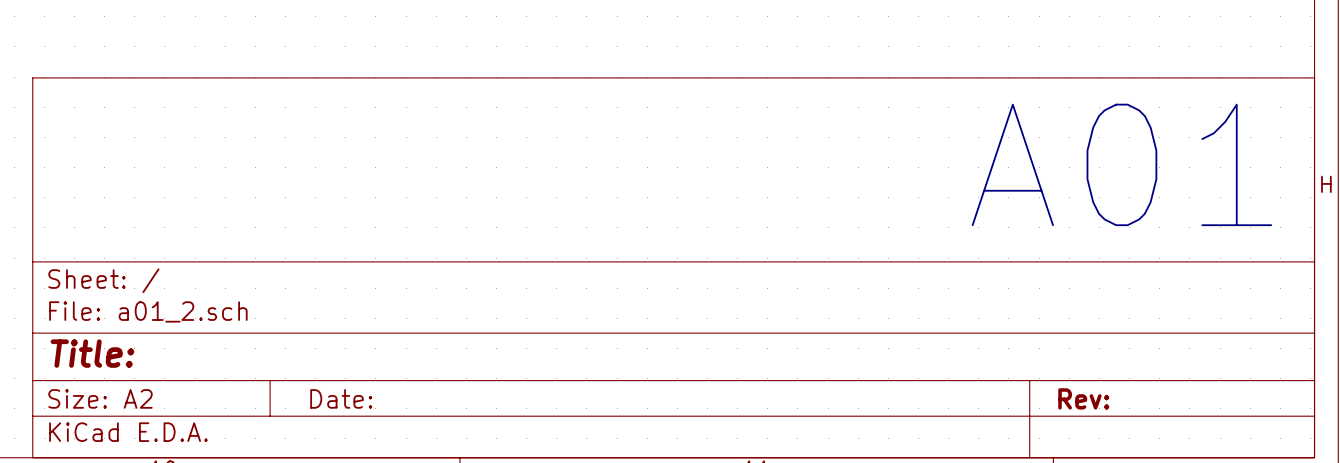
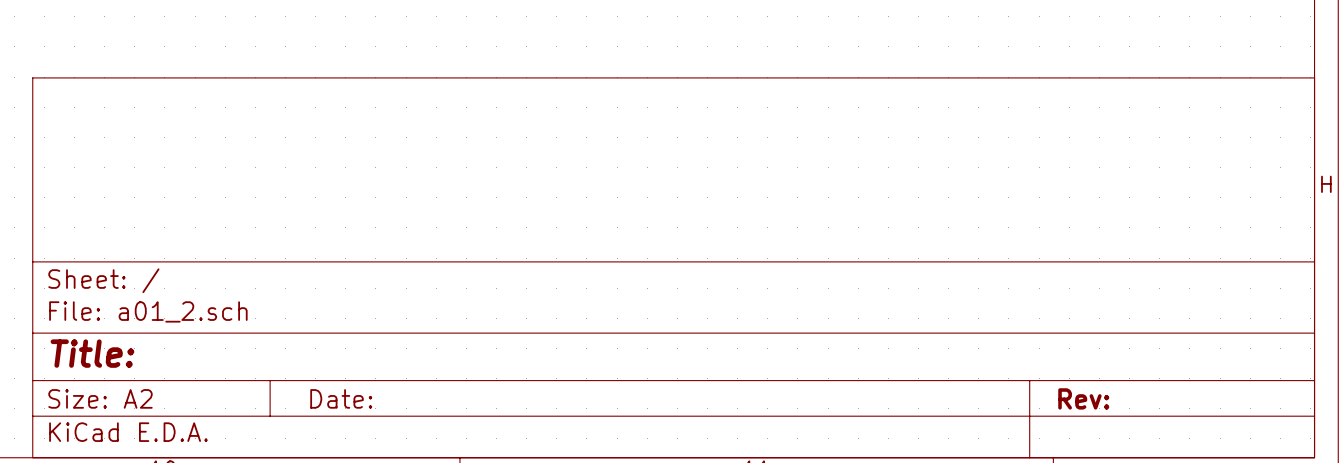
text: A01 (1121, 164) -> none

